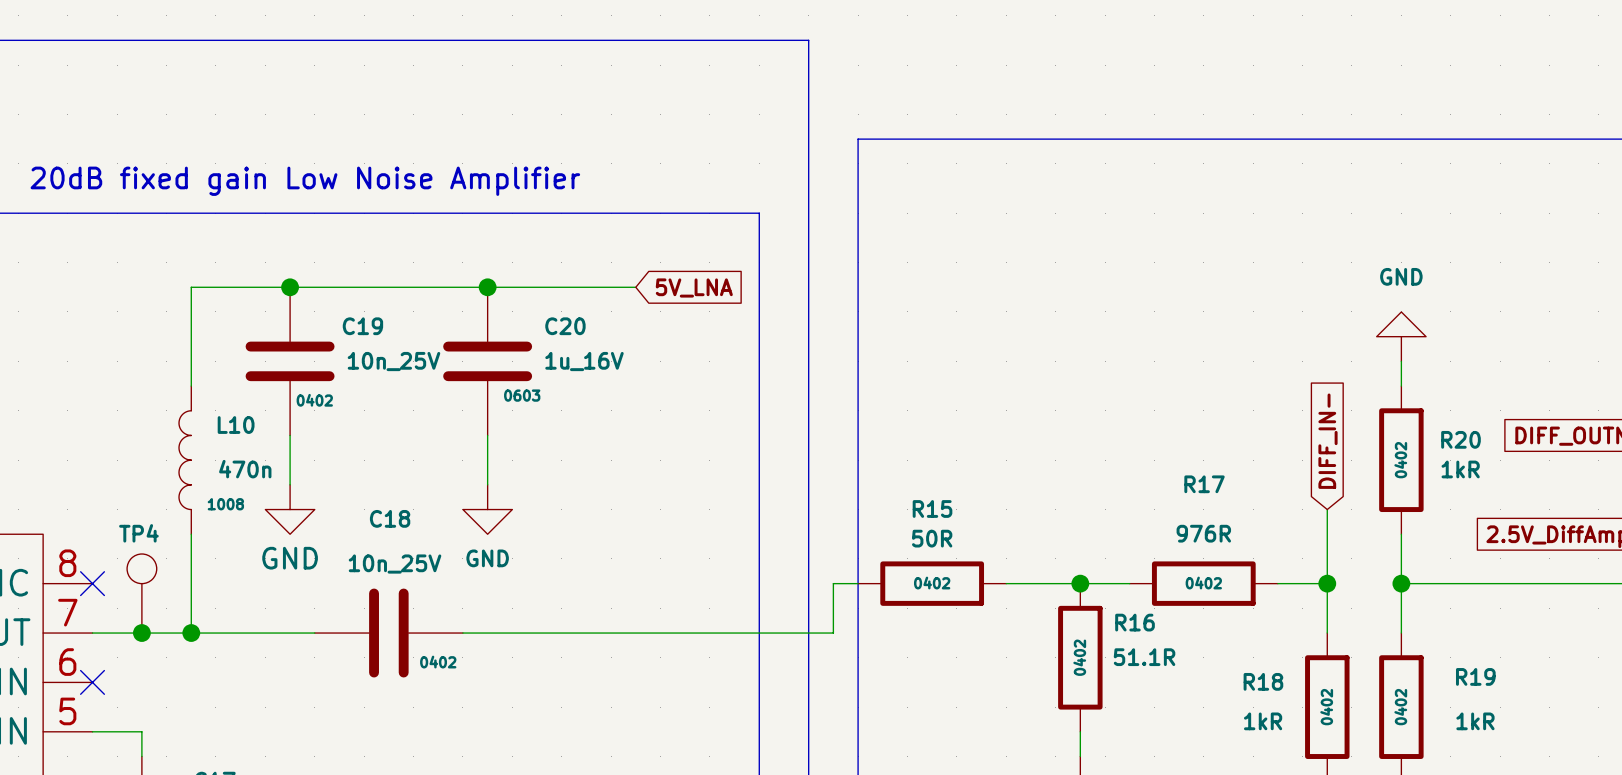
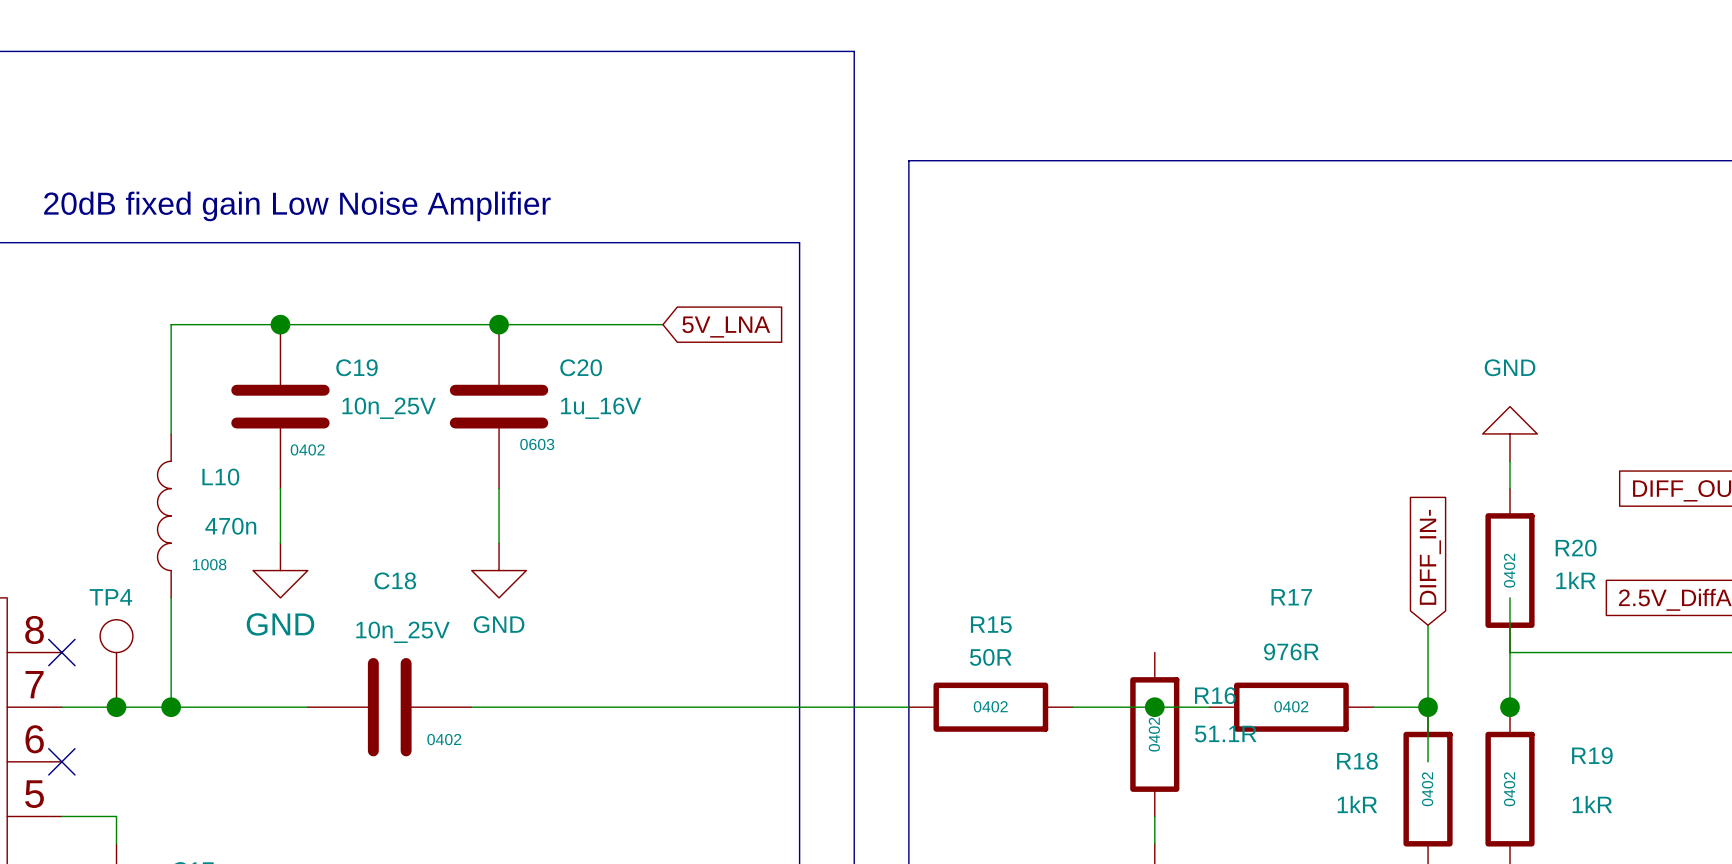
power symbol position: GND (1401, 336) -> GND (1510, 433)
wire: (1401, 361) (1401, 386) -> (1510, 461) (1510, 488)
global label position: DIFF_IN- (1327, 441) -> DIFF_IN- (1430, 557)
R20 position: (1401, 460) -> (1510, 570)
wire: (1327, 509) (1327, 558) -> none
wire: (858, 583) (833, 583) (833, 633) -> (908, 707) (881, 707)
R15 position: (932, 583) -> (990, 707)
wire: (1006, 583) (1129, 583) -> (1072, 707) (1209, 707)
junction position: (1080, 583) -> (1154, 707)
R17 position: (1203, 583) -> (1291, 707)
wire: (1277, 583) (1327, 583) -> none
junction: (1327, 583) -> none
junction: (1401, 583) -> none
wire: none -> (1373, 707) (1428, 707) (1428, 761)
junction: none -> (1428, 707)
junction: none -> (1510, 707)

